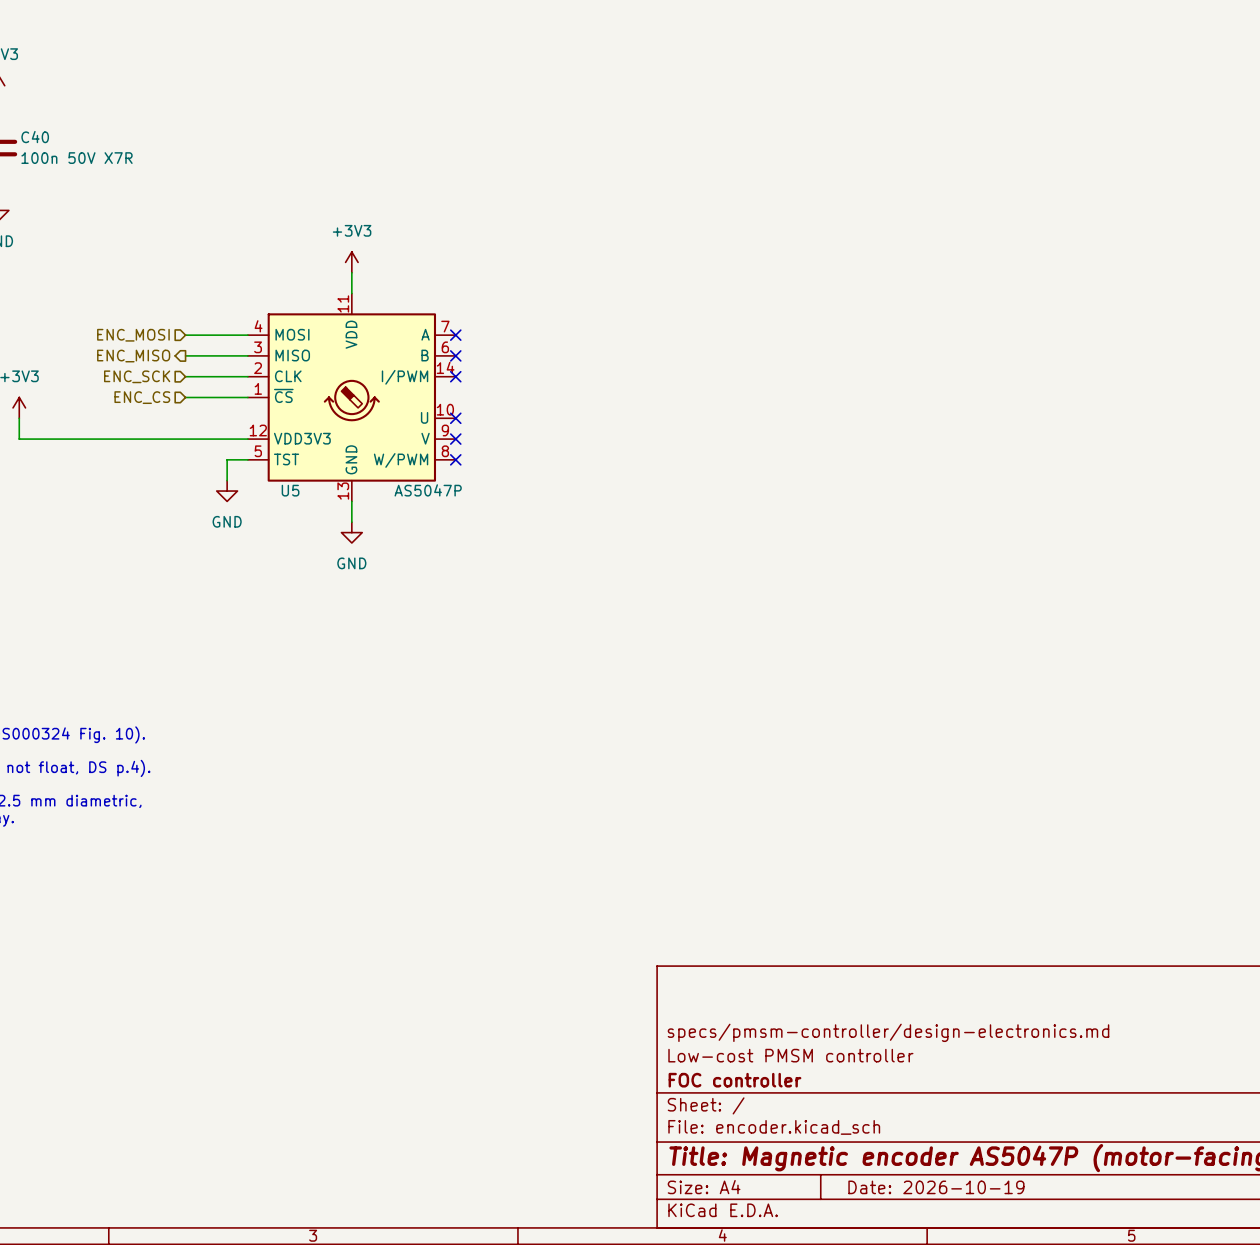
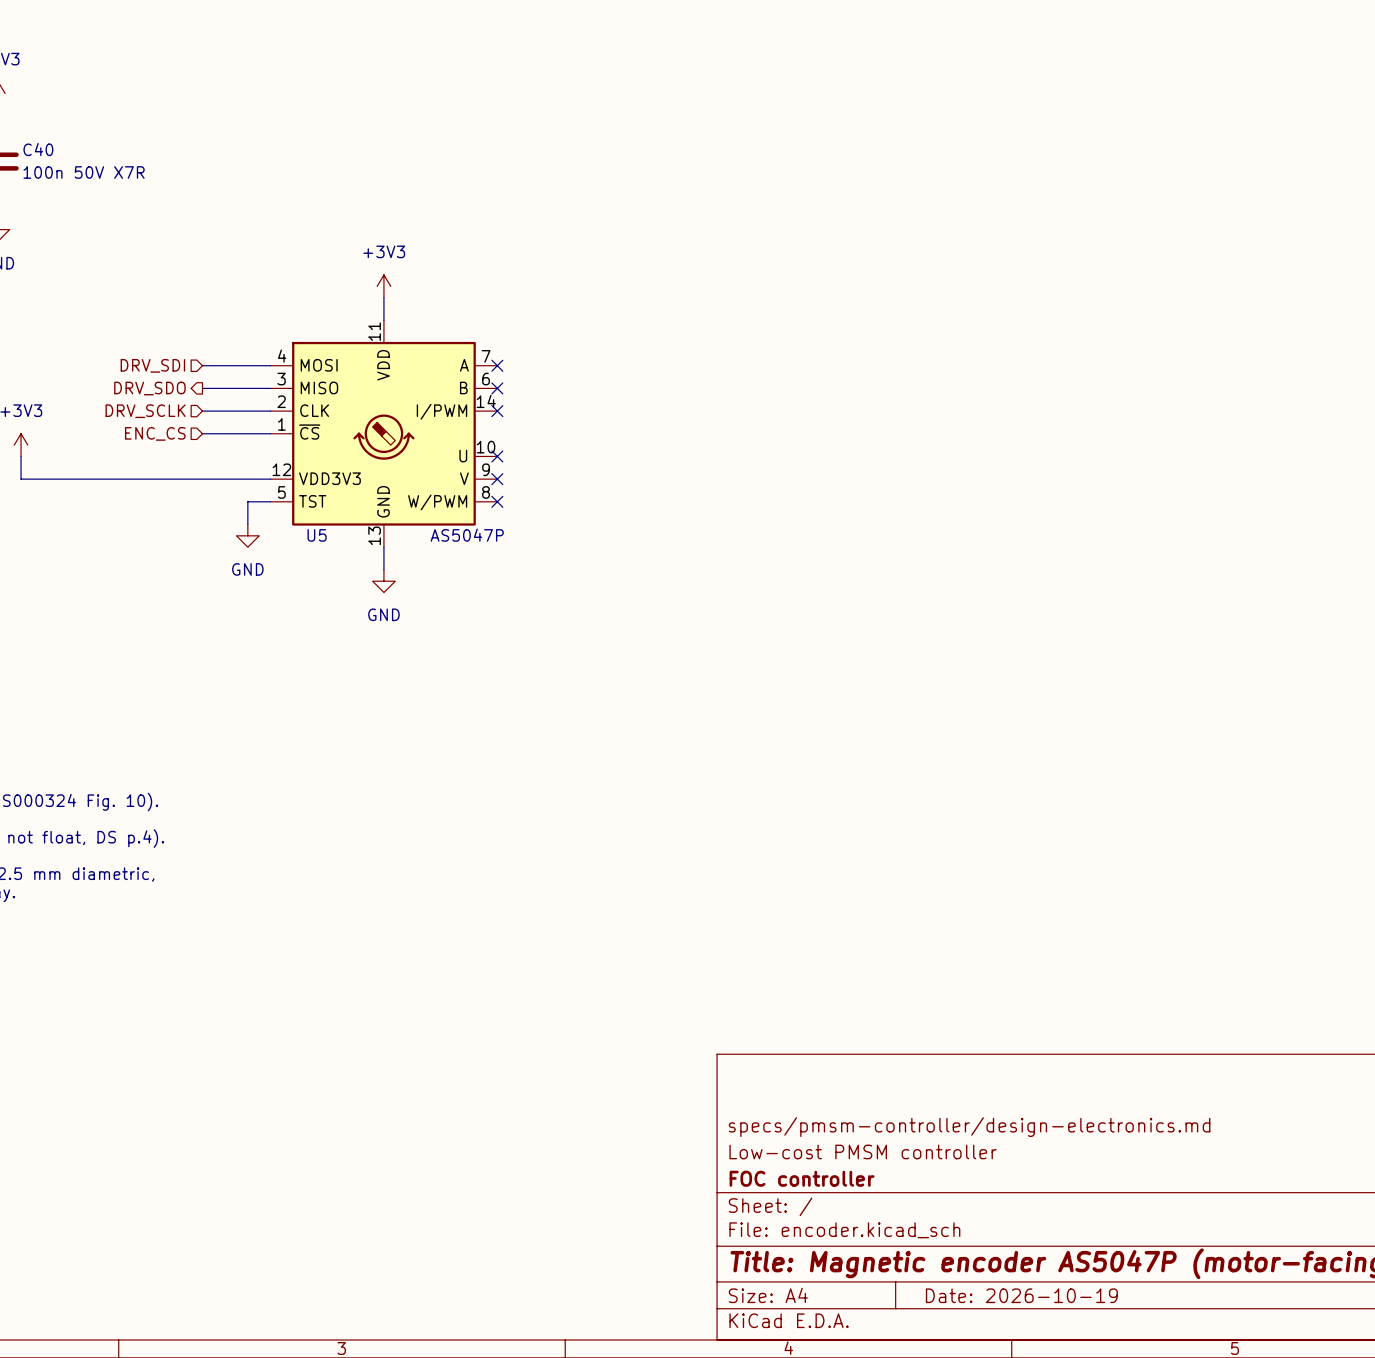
hierarchical label: ENC_MOSI (133, 335) -> DRV_SDI (152, 365)
hierarchical label: ENC_MISO (133, 356) -> DRV_SDO (149, 388)
hierarchical label: ENC_SCK (137, 376) -> DRV_SCLK (145, 411)

